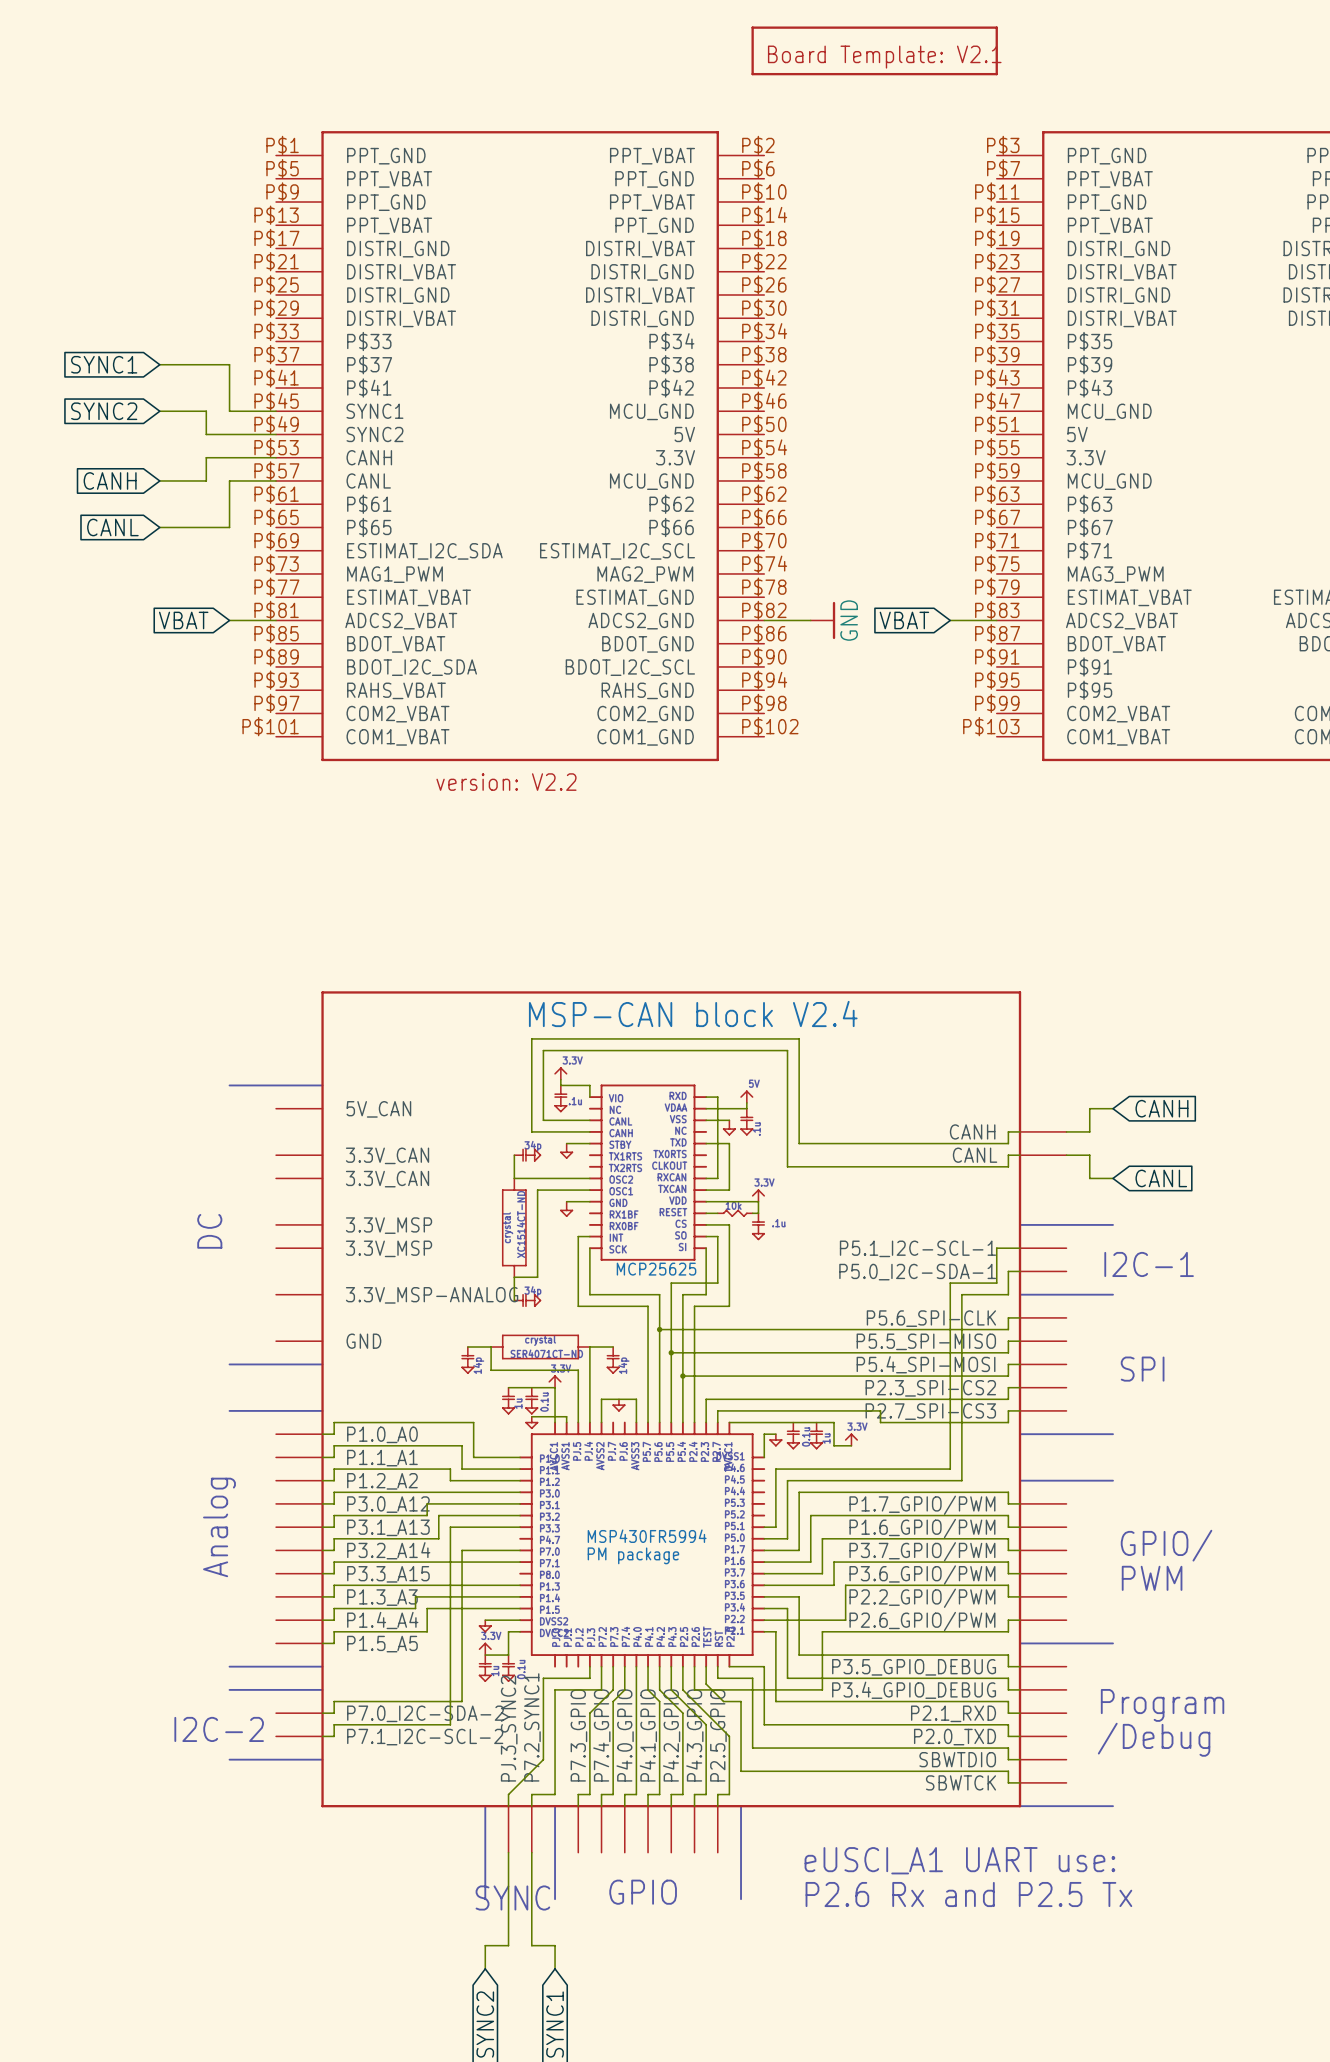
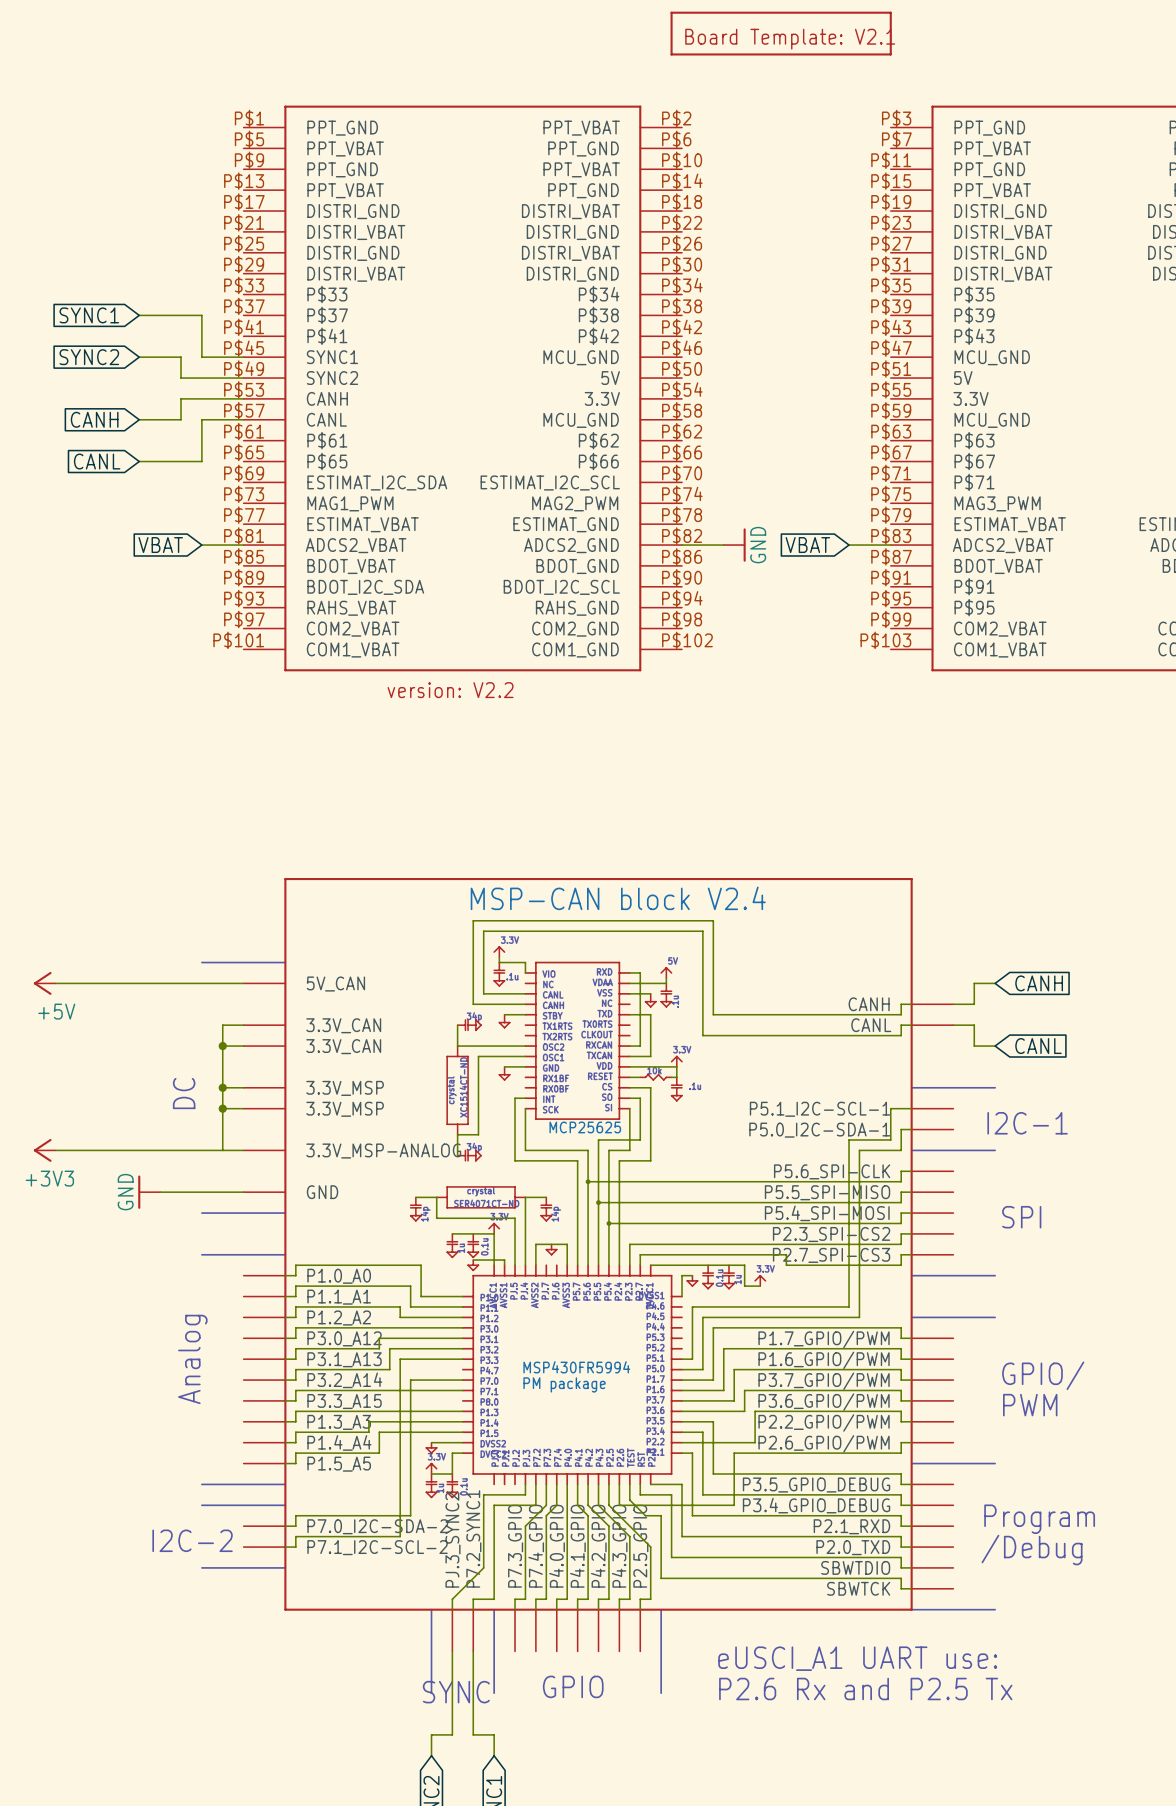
power symbol: none -> +5V (44, 983)
wire: none -> (55, 983) (243, 983)
wire: none -> (243, 1025) (222, 1025) (222, 1150)
wire: none -> (222, 1046) (243, 1046)
junction: none -> (222, 1046)
wire: none -> (222, 1087) (243, 1087)
junction: none -> (222, 1087)
wire: none -> (222, 1108) (243, 1108)
junction: none -> (222, 1108)
power symbol: none -> +3V3 (44, 1150)
wire: none -> (55, 1150) (243, 1150)
power symbol: none -> GND (149, 1192)
wire: none -> (160, 1192) (243, 1192)

